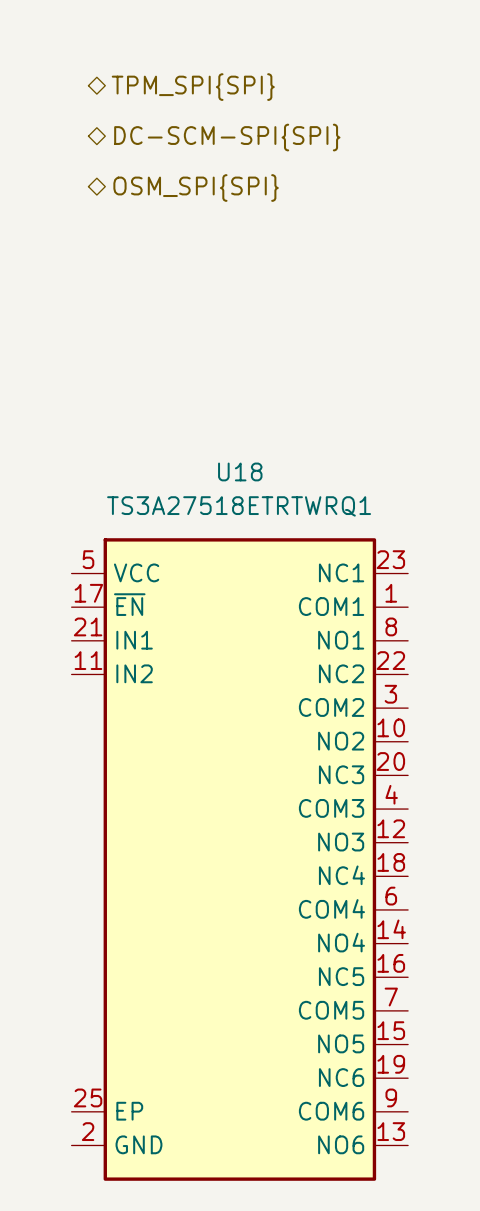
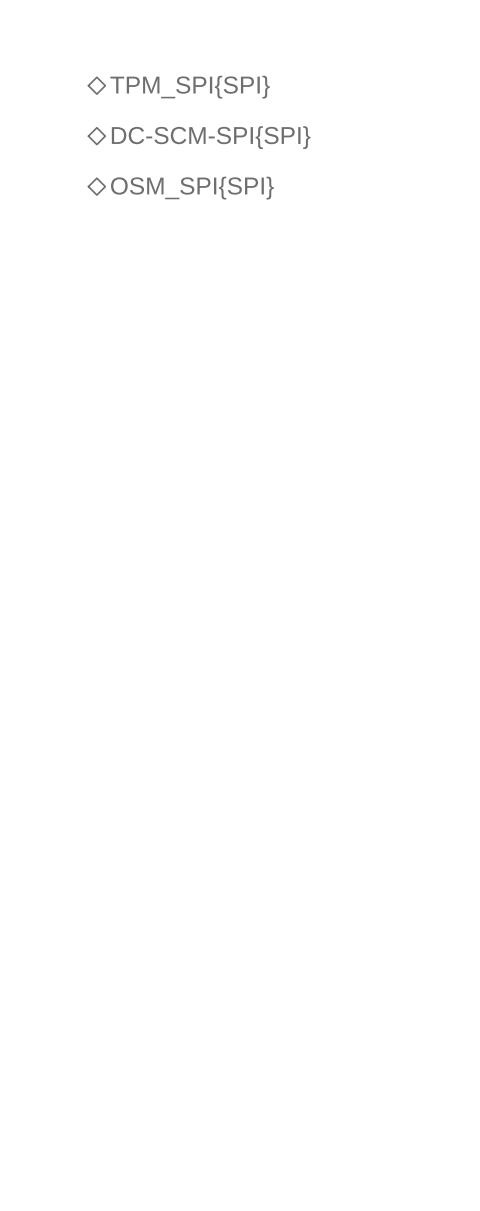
U18: (239, 859) -> none

